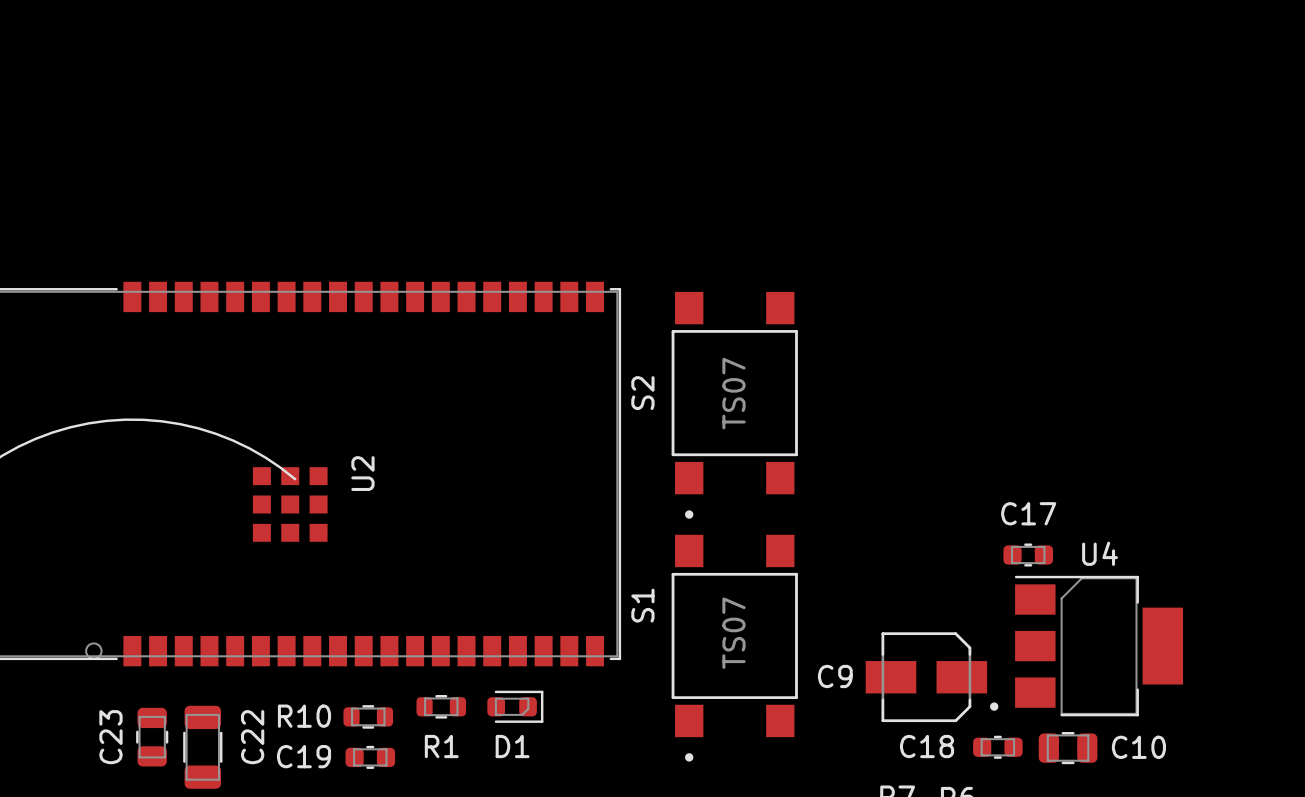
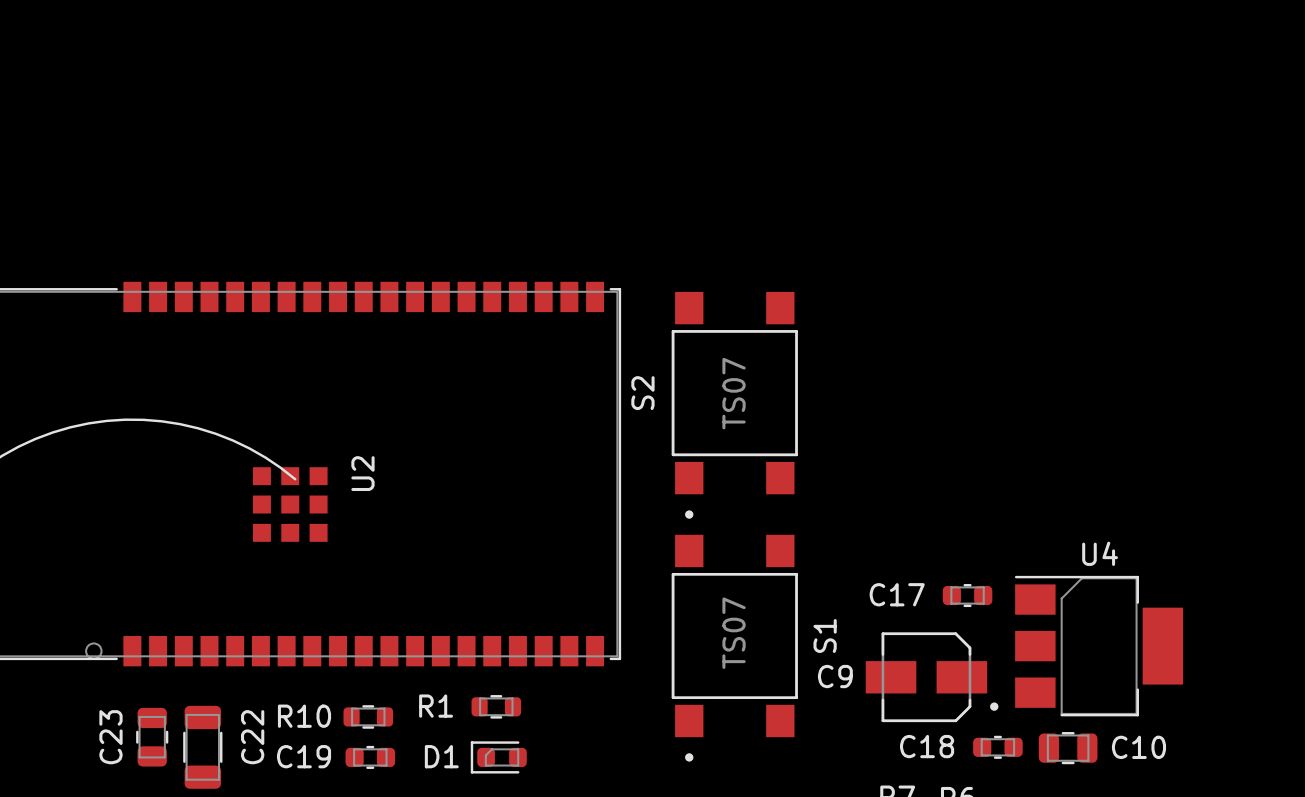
C17 name position: C17 (1028, 513) -> C17 (897, 594)
C17 position: (1028, 555) -> (967, 595)
S1 name position: S1 (642, 605) -> S1 (825, 635)
R1 position: (441, 706) -> (496, 706)
D1 rotation: 0° (515, 706) -> 180° (498, 757)
D1 position: (515, 706) -> (498, 757)
R1 name position: R1 (441, 746) -> R1 (436, 706)
D1 name position: D1 (512, 746) -> D1 (441, 756)

